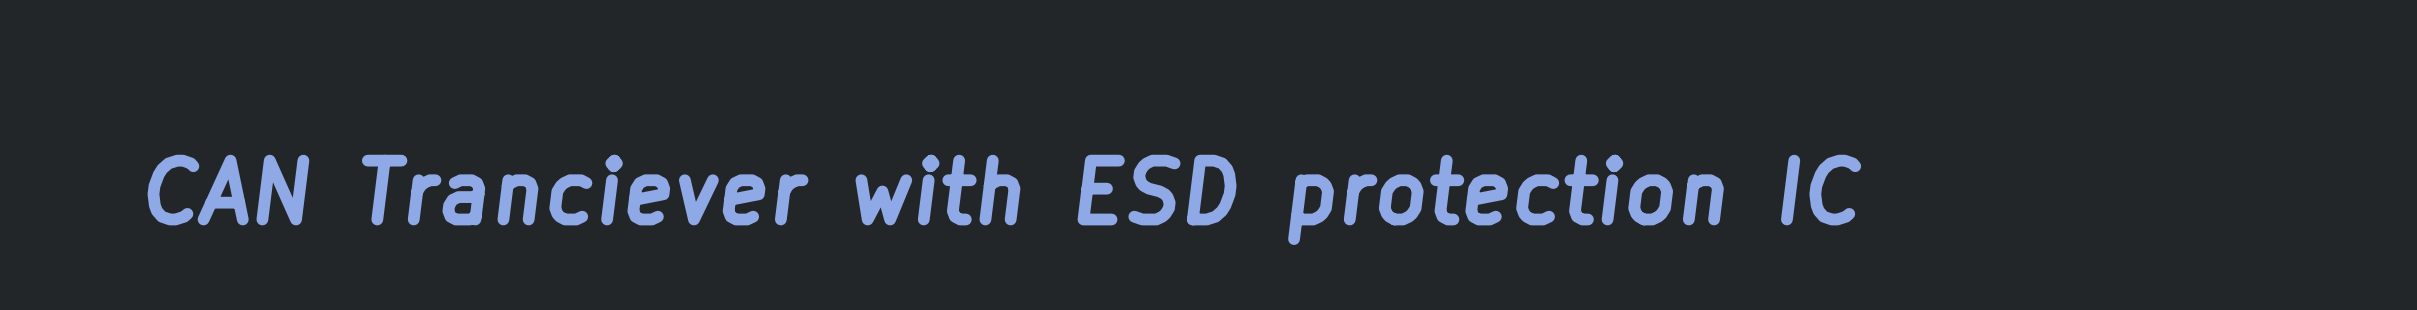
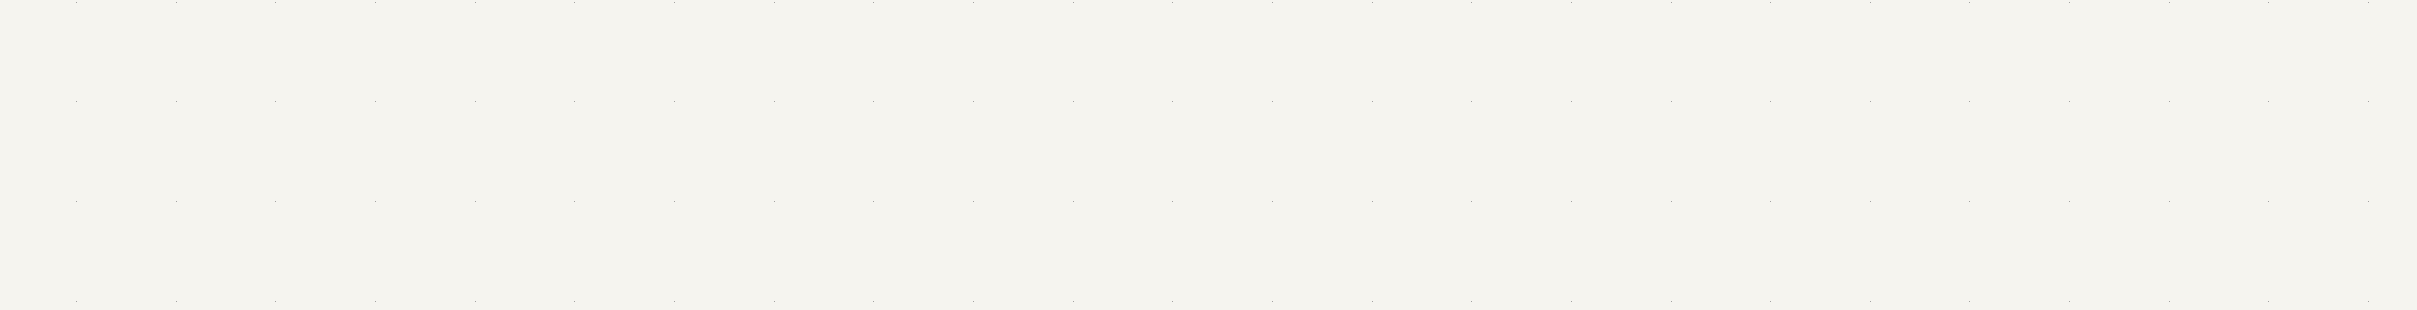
text: CAN Tranciever with ESD protection IC (1004, 199) -> none

